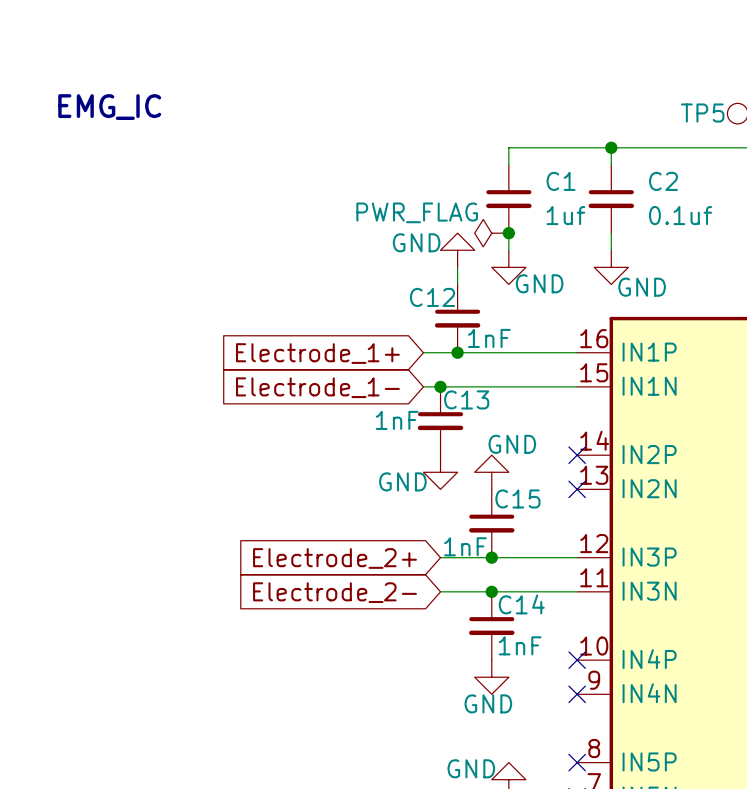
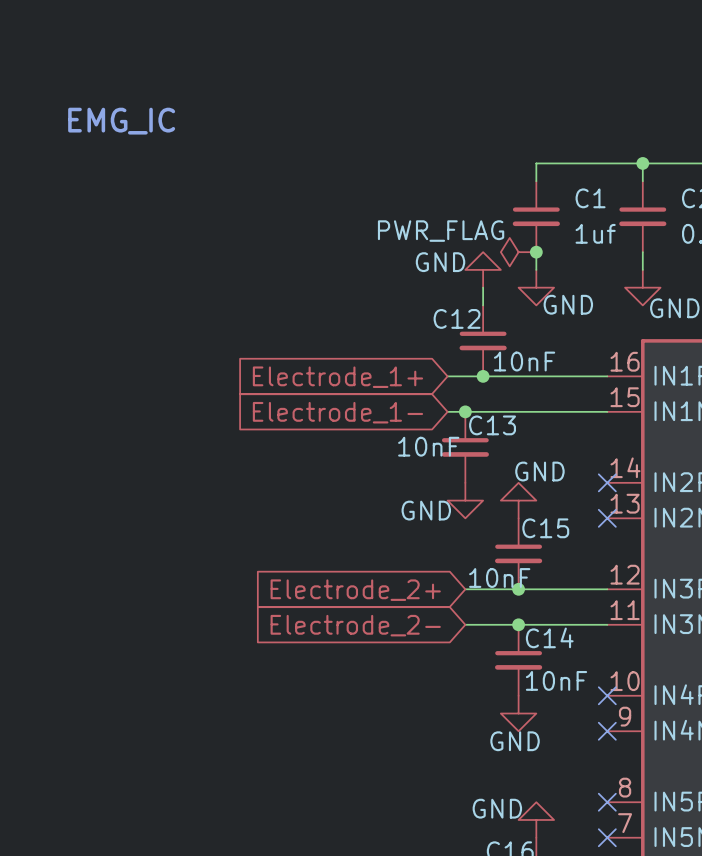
C12 value: 1nF (489, 338) -> 10nF (524, 361)
C13 value: 1nF (397, 420) -> 10nF (428, 446)
C15 value: 1nF (465, 546) -> 10nF (499, 578)
C14 value: 1nF (520, 645) -> 10nF (556, 680)

